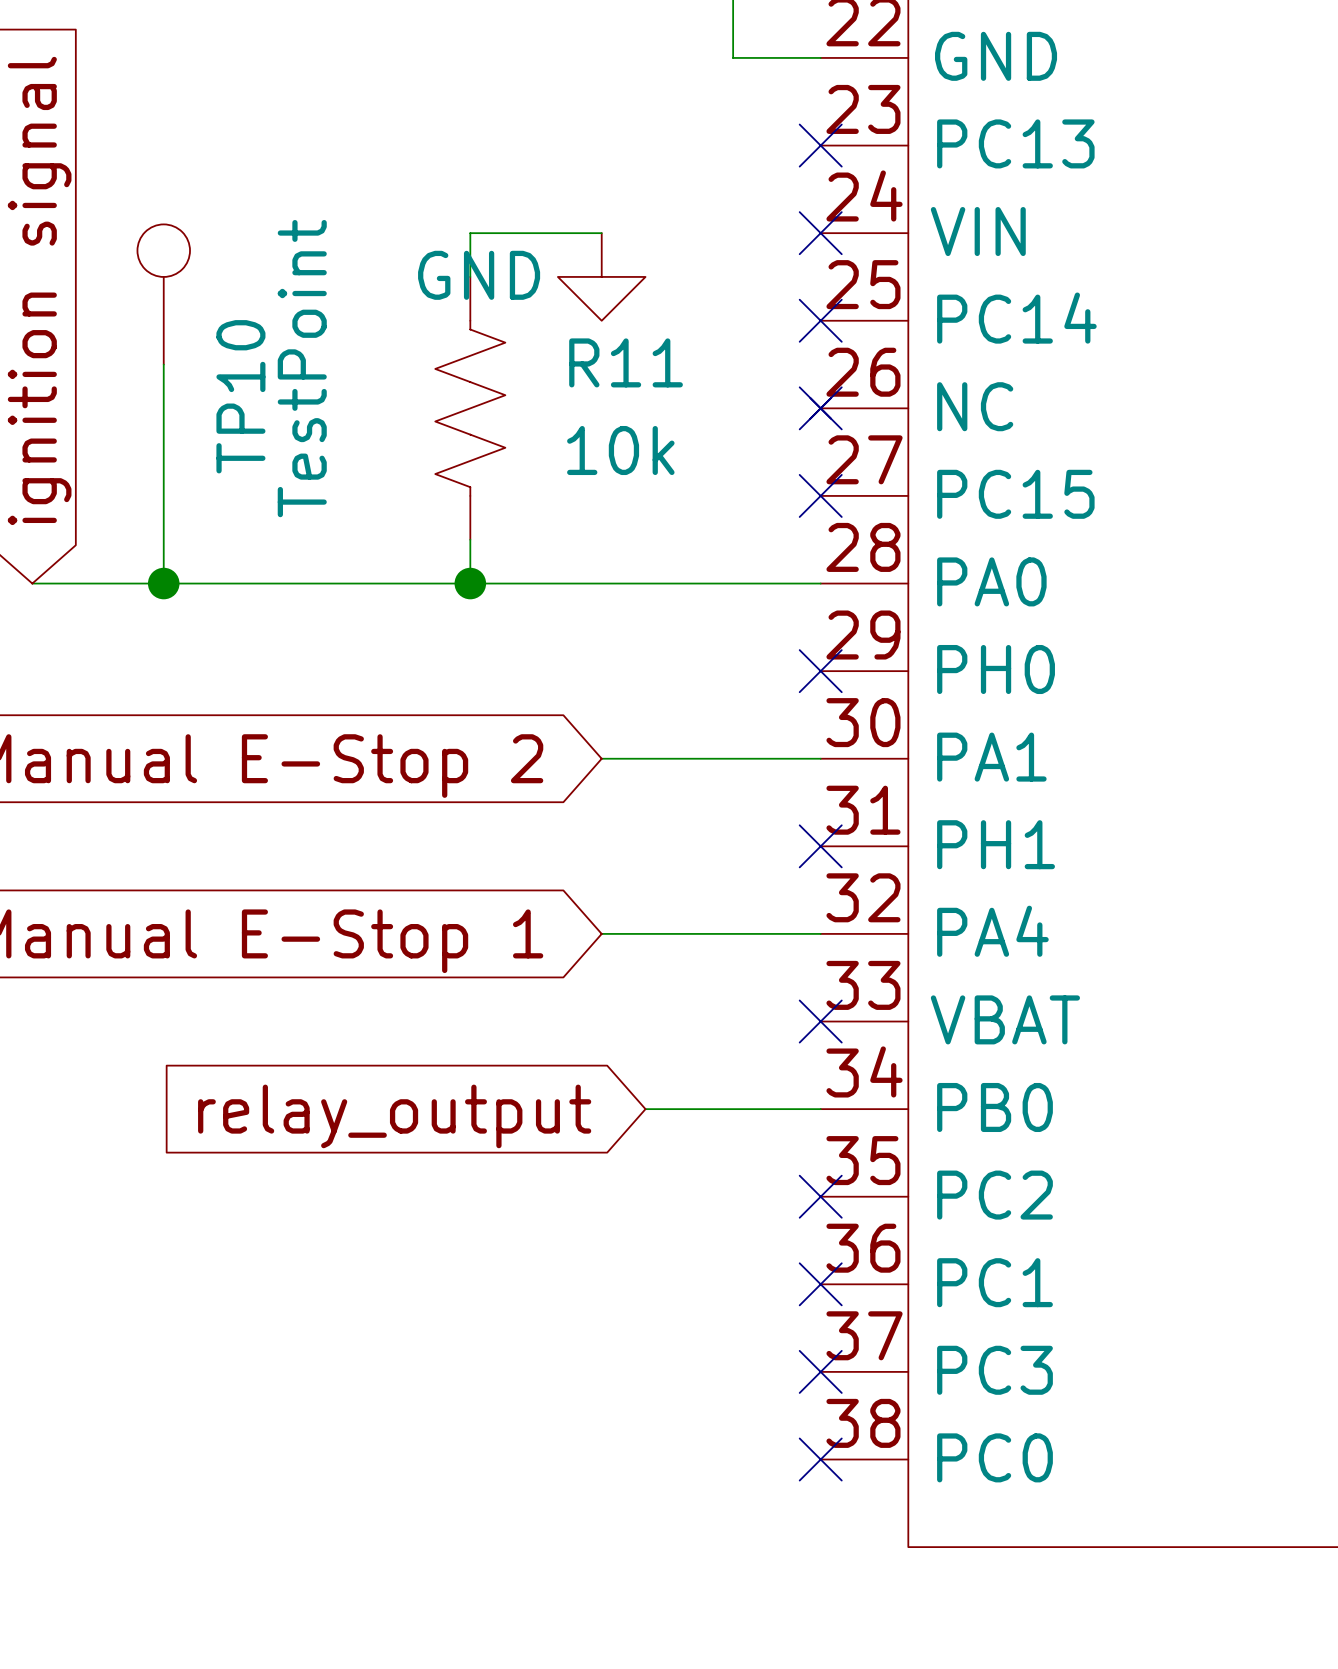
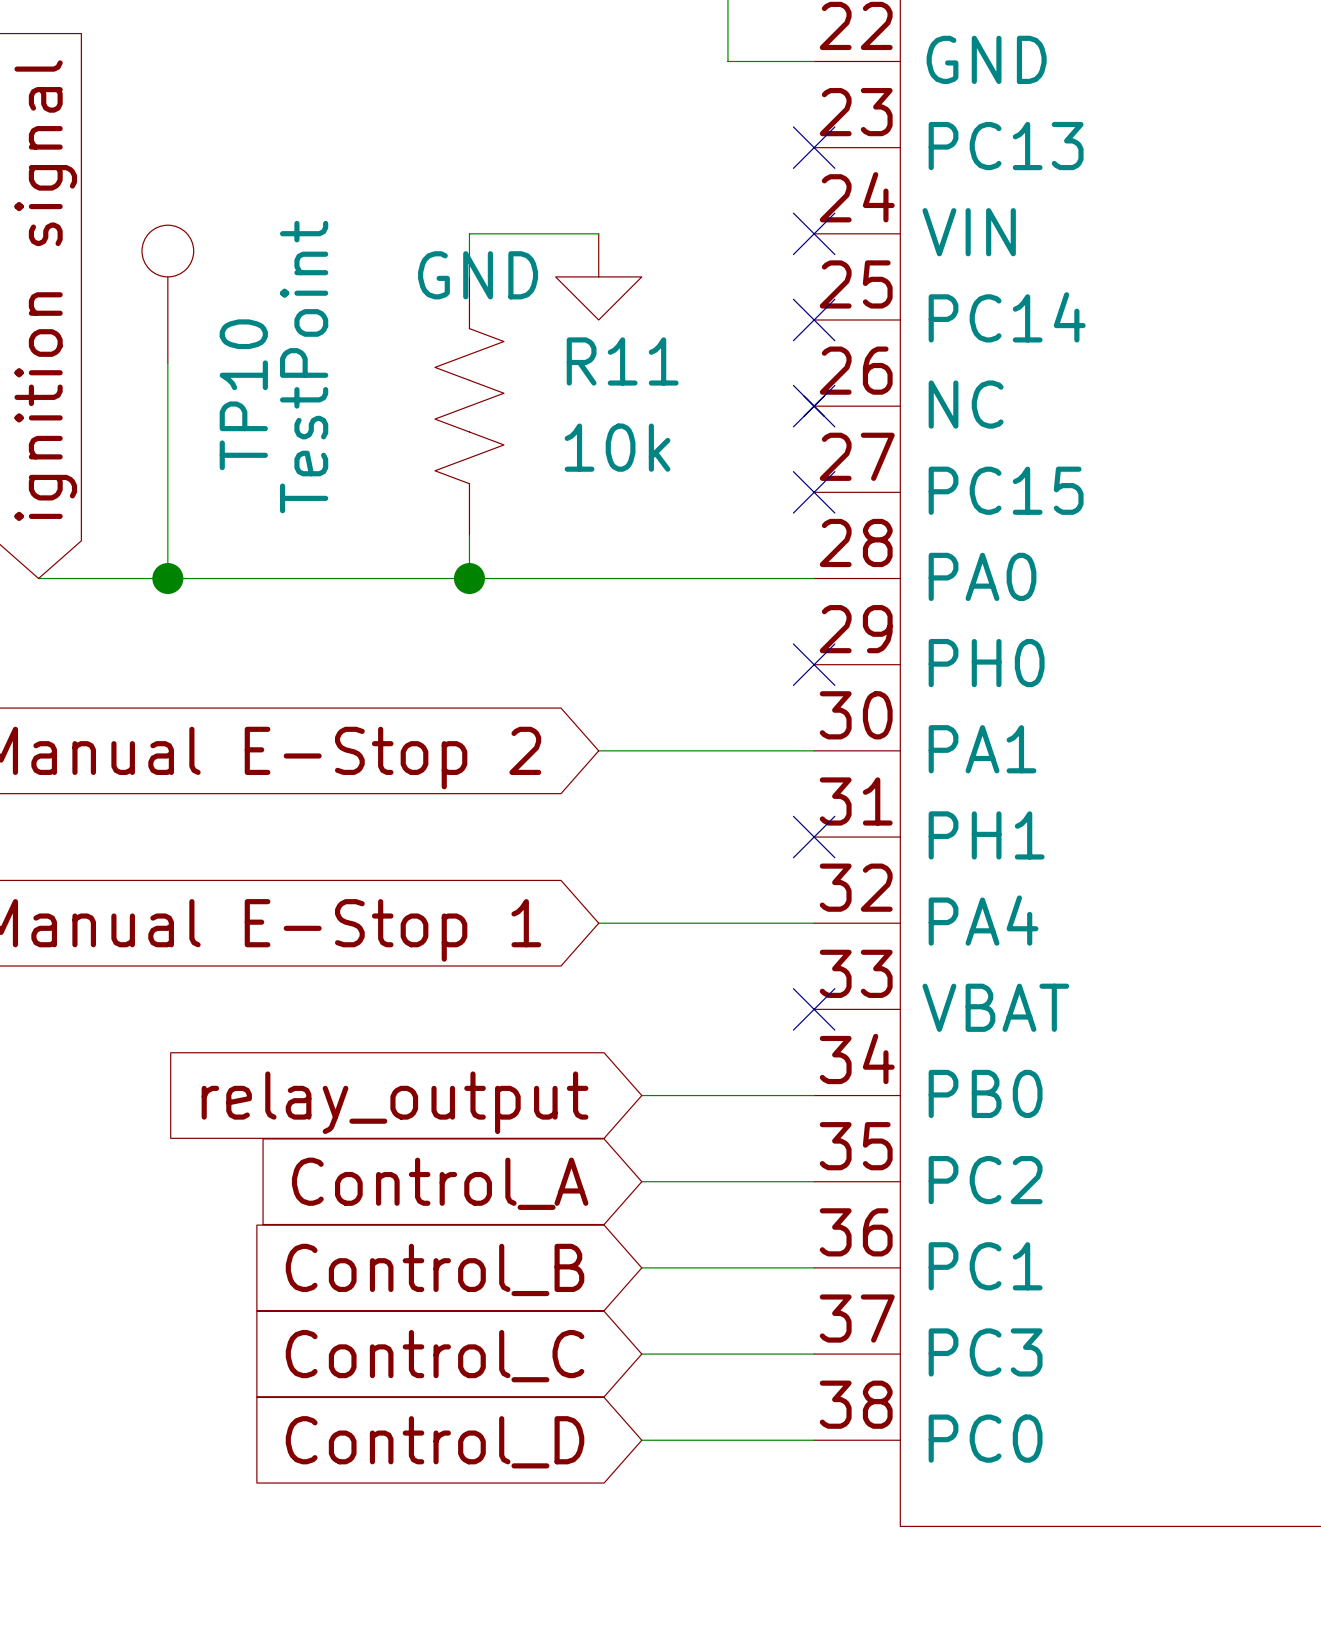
wire: none -> (641, 1181) (814, 1181)
no-connect mark: (820, 1196) -> none
global label: none -> Control_A (440, 1183)
wire: none -> (641, 1267) (814, 1267)
no-connect mark: (820, 1284) -> none
global label: none -> Control_B (435, 1269)
wire: none -> (641, 1354) (814, 1354)
no-connect mark: (820, 1371) -> none
global label: none -> Control_C (435, 1356)
wire: none -> (641, 1440) (814, 1440)
no-connect mark: (820, 1459) -> none
global label: none -> Control_D (435, 1442)

